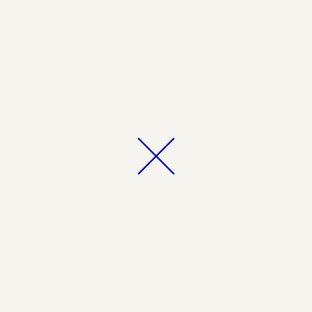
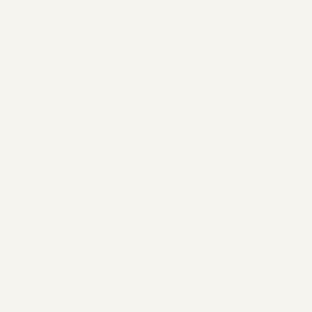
no-connect mark: (156, 156) -> none

